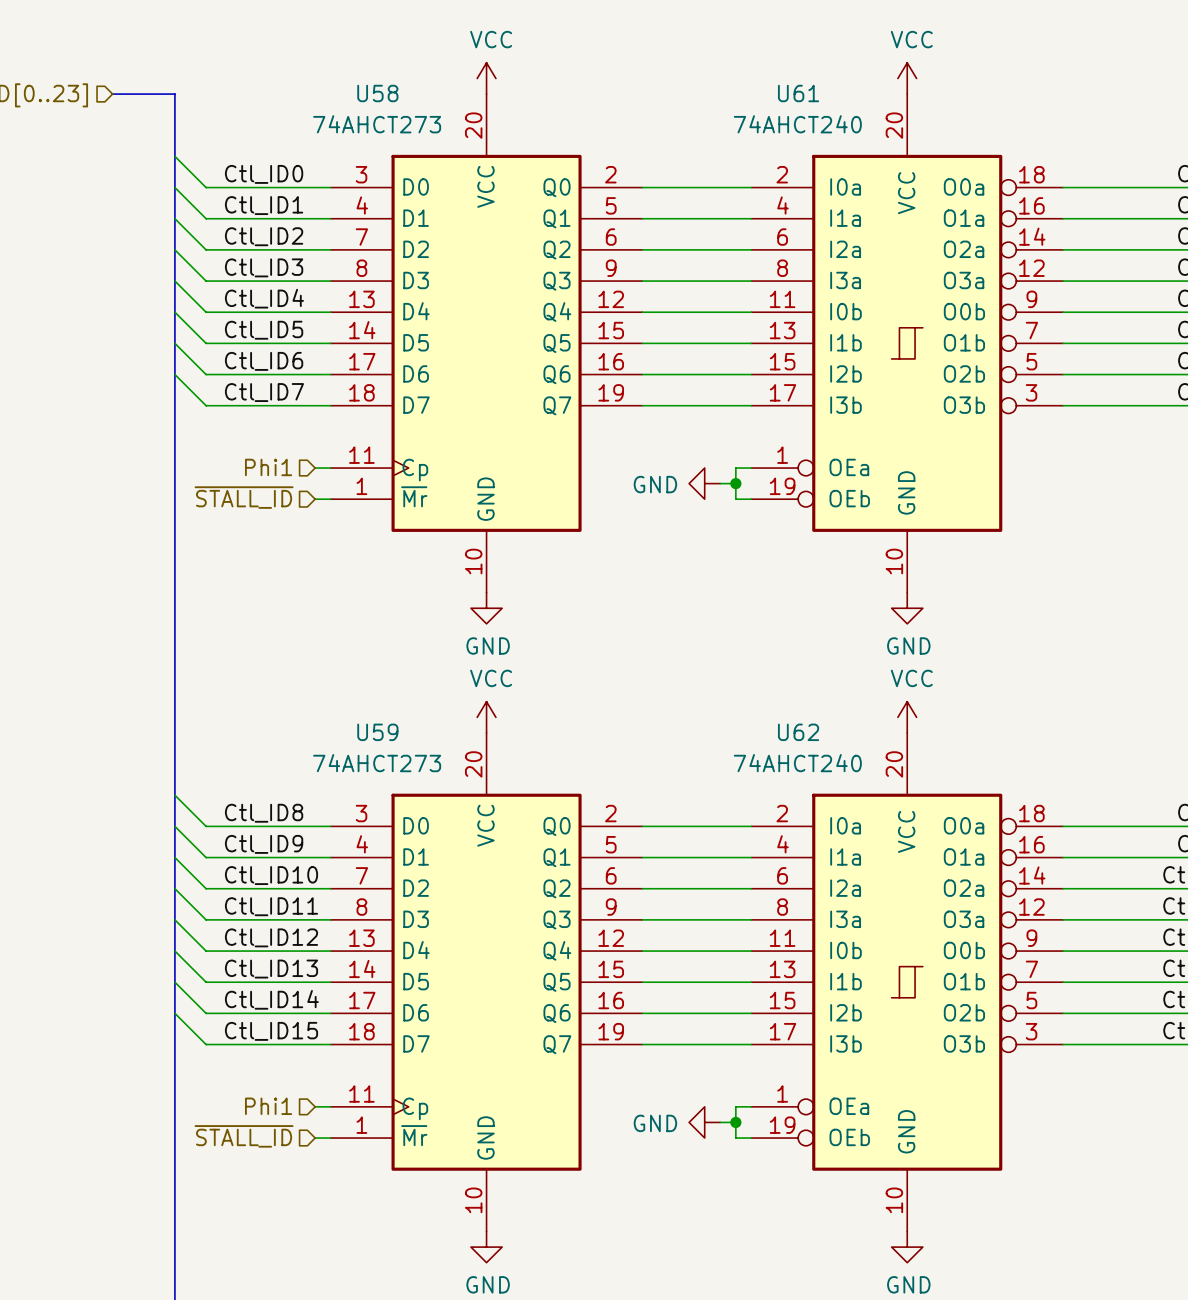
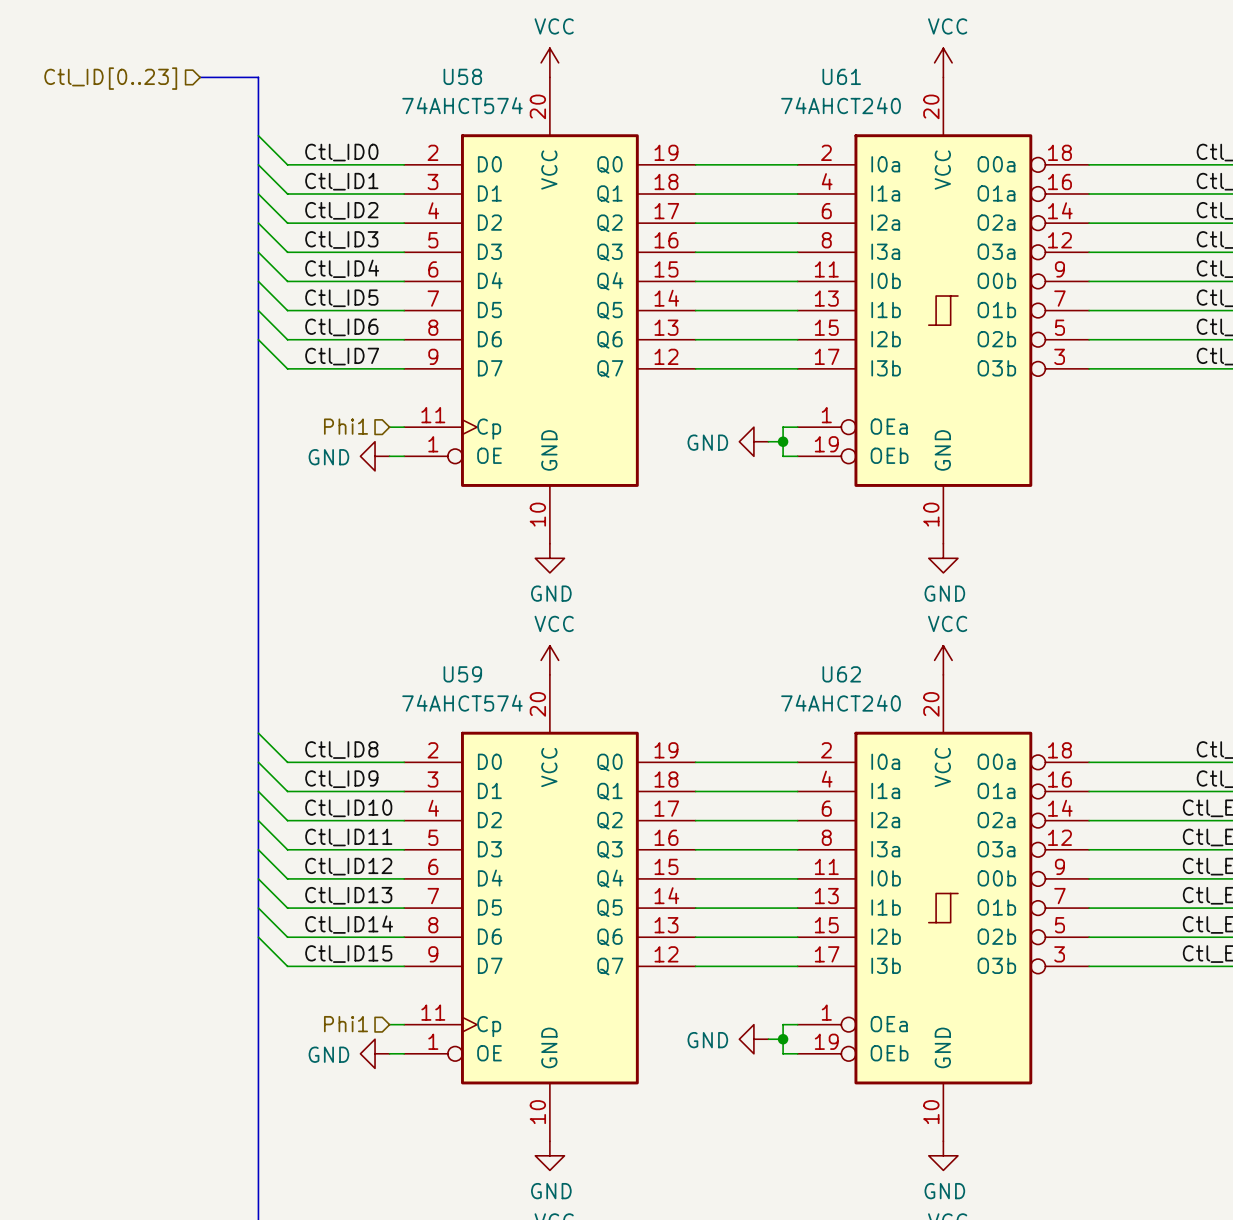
U58 symbol: [330, 94, 643, 593] -> [404, 77, 696, 544]
U58 value: 74AHCT273 (377, 124) -> 74AHCT574 (462, 105)
hierarchical label: ~{STALL_ID} (244, 497) -> none
power symbol: none -> GND (375, 456)
U59 symbol: [330, 732, 643, 1232] -> [404, 674, 696, 1142]
U59 value: 74AHCT273 (377, 763) -> 74AHCT574 (462, 703)
hierarchical label: ~{STALL_ID} (244, 1136) -> none
power symbol: none -> GND (375, 1053)

